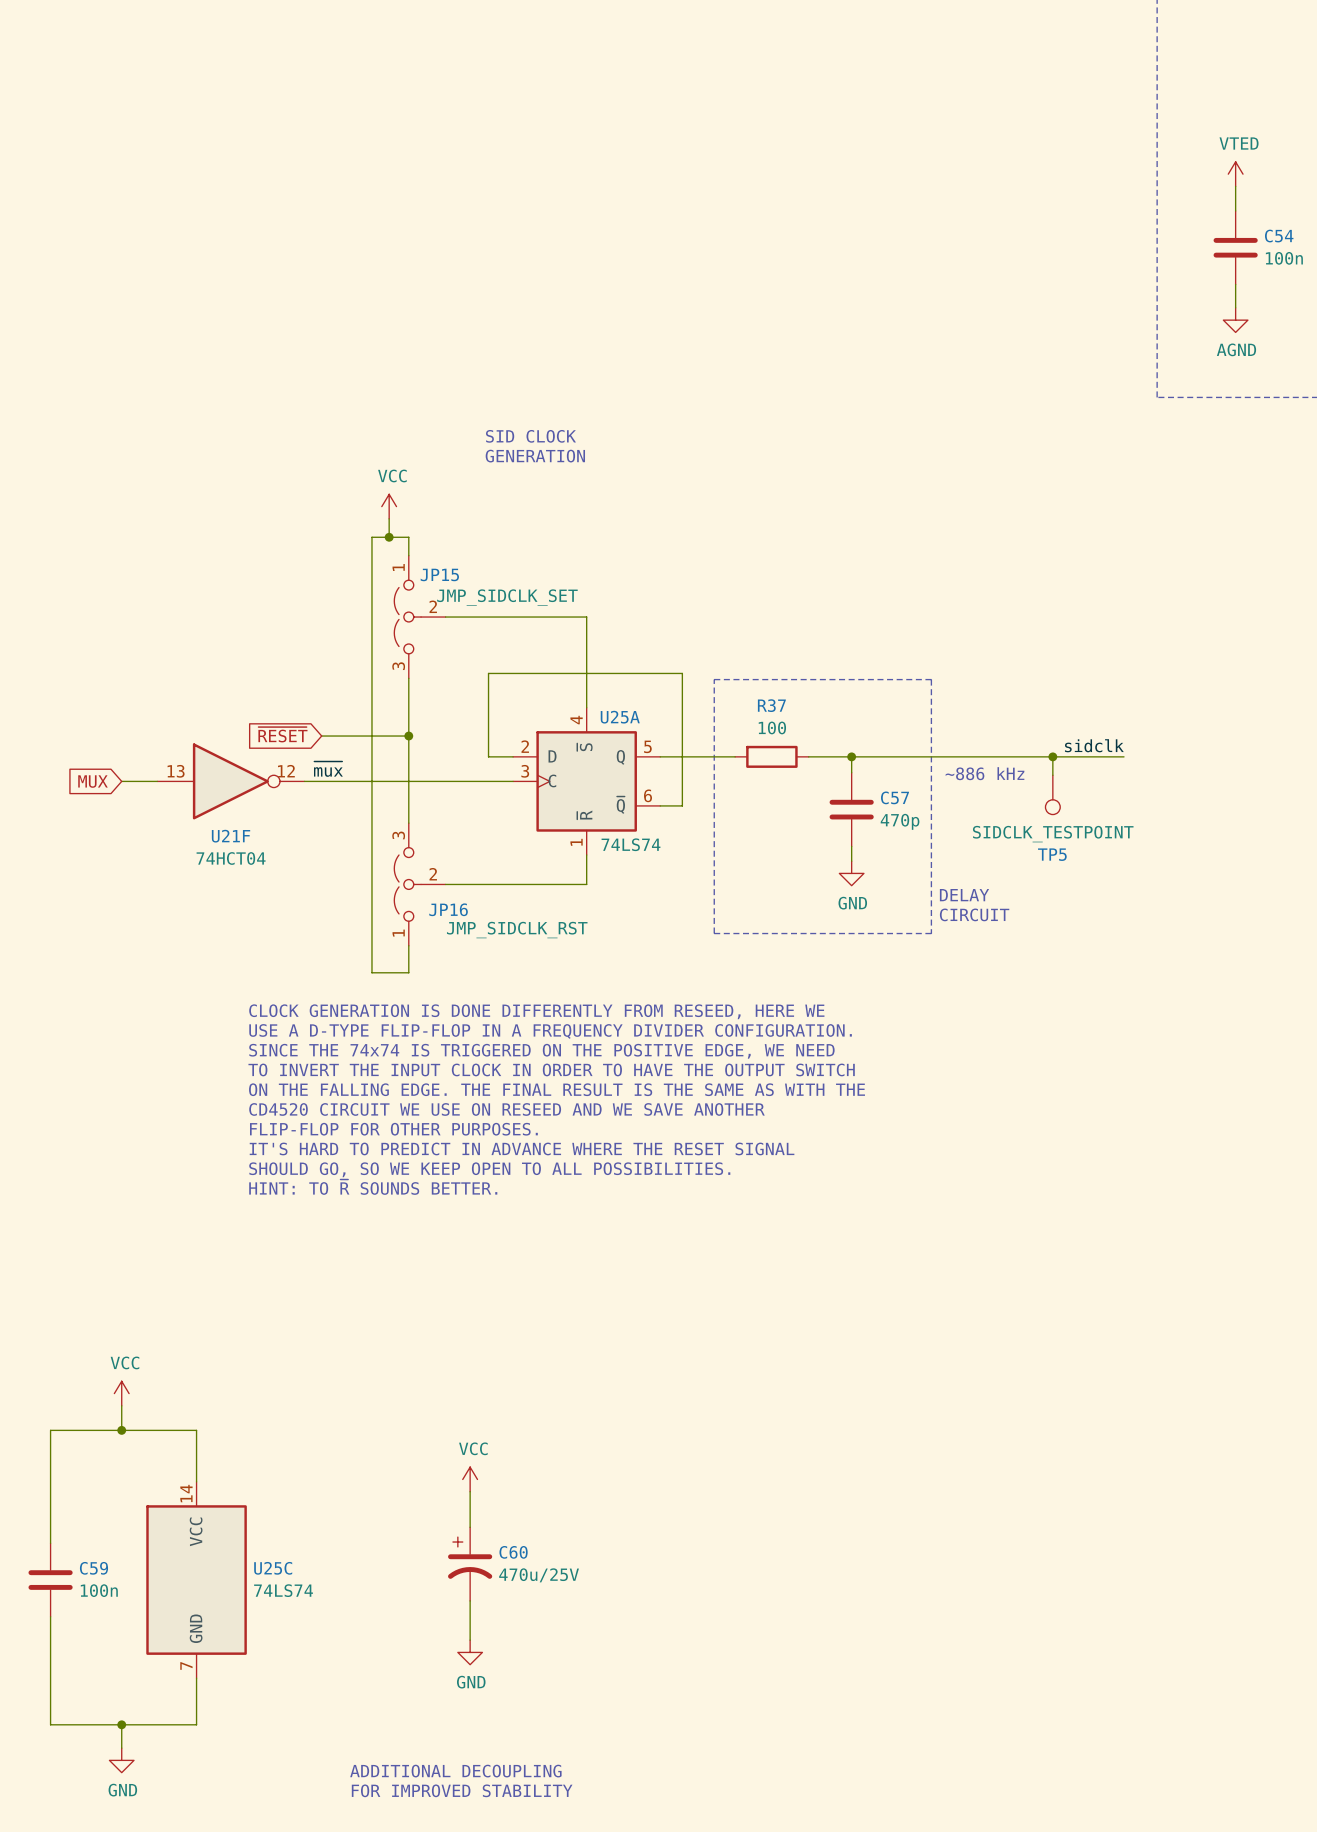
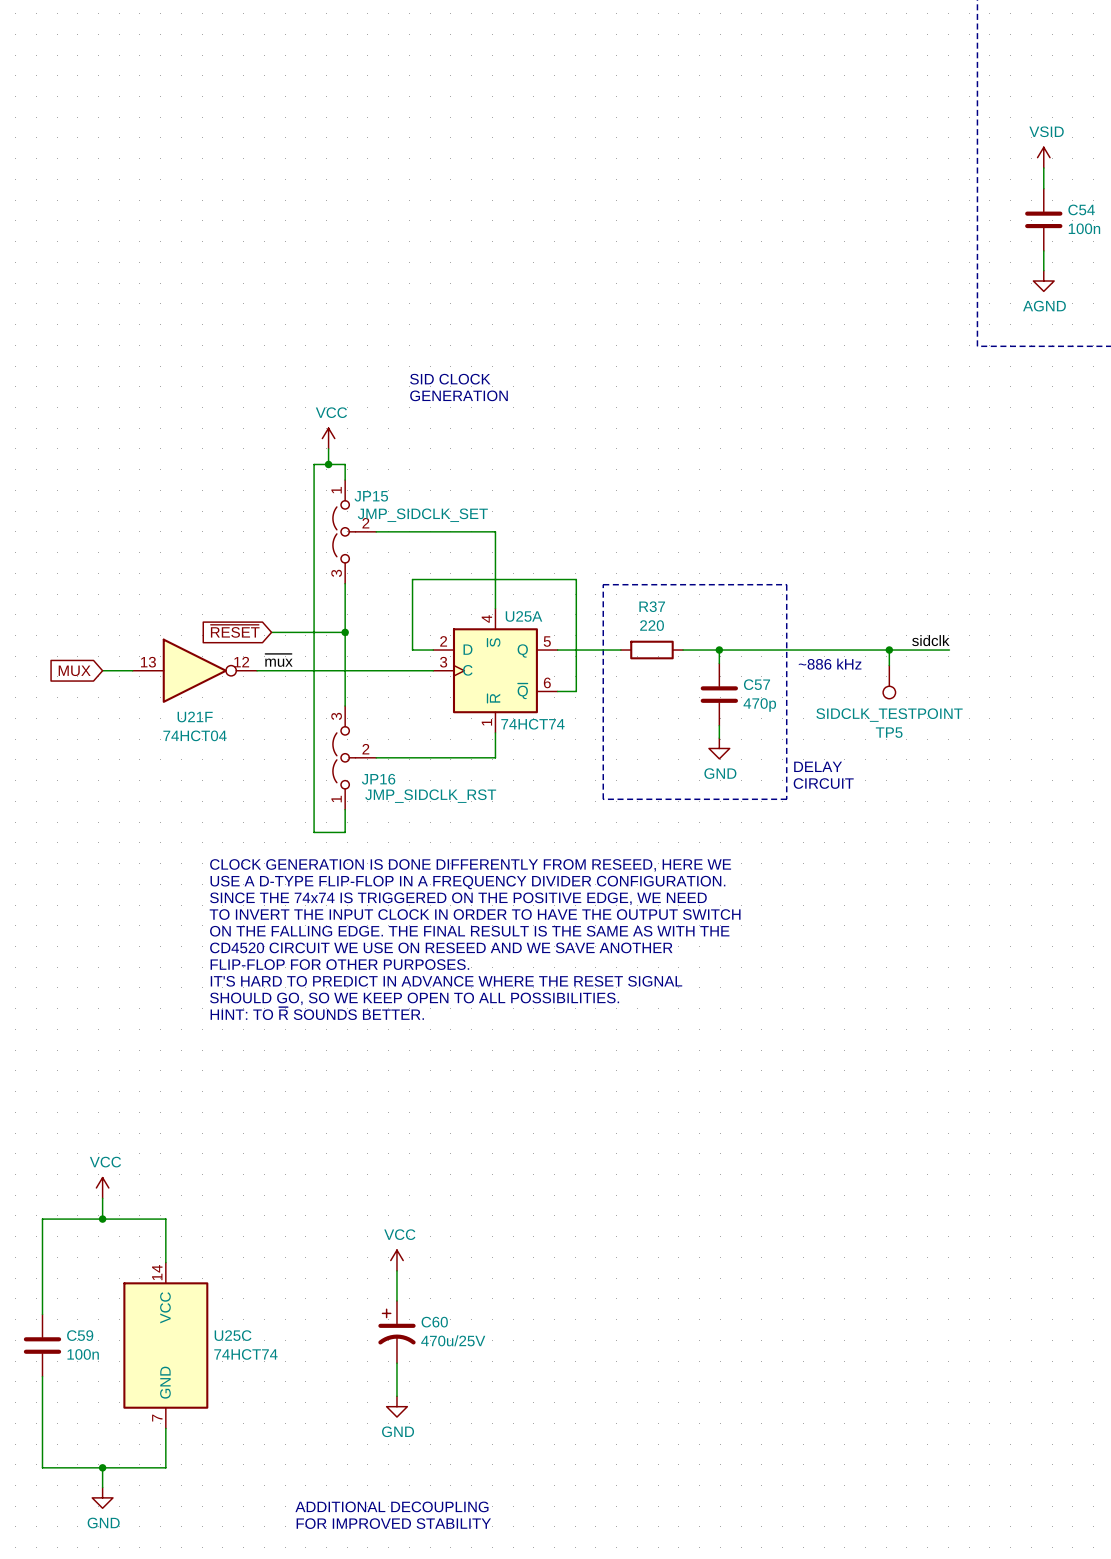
power symbol: VTED (1235, 174) -> VSID (1043, 157)
R37 value: 100 (772, 727) -> 220 (652, 625)
U25A value: 74LS74 (631, 844) -> 74HCT74 (532, 724)
U25C value: 74LS74 (283, 1590) -> 74HCT74 (245, 1354)

